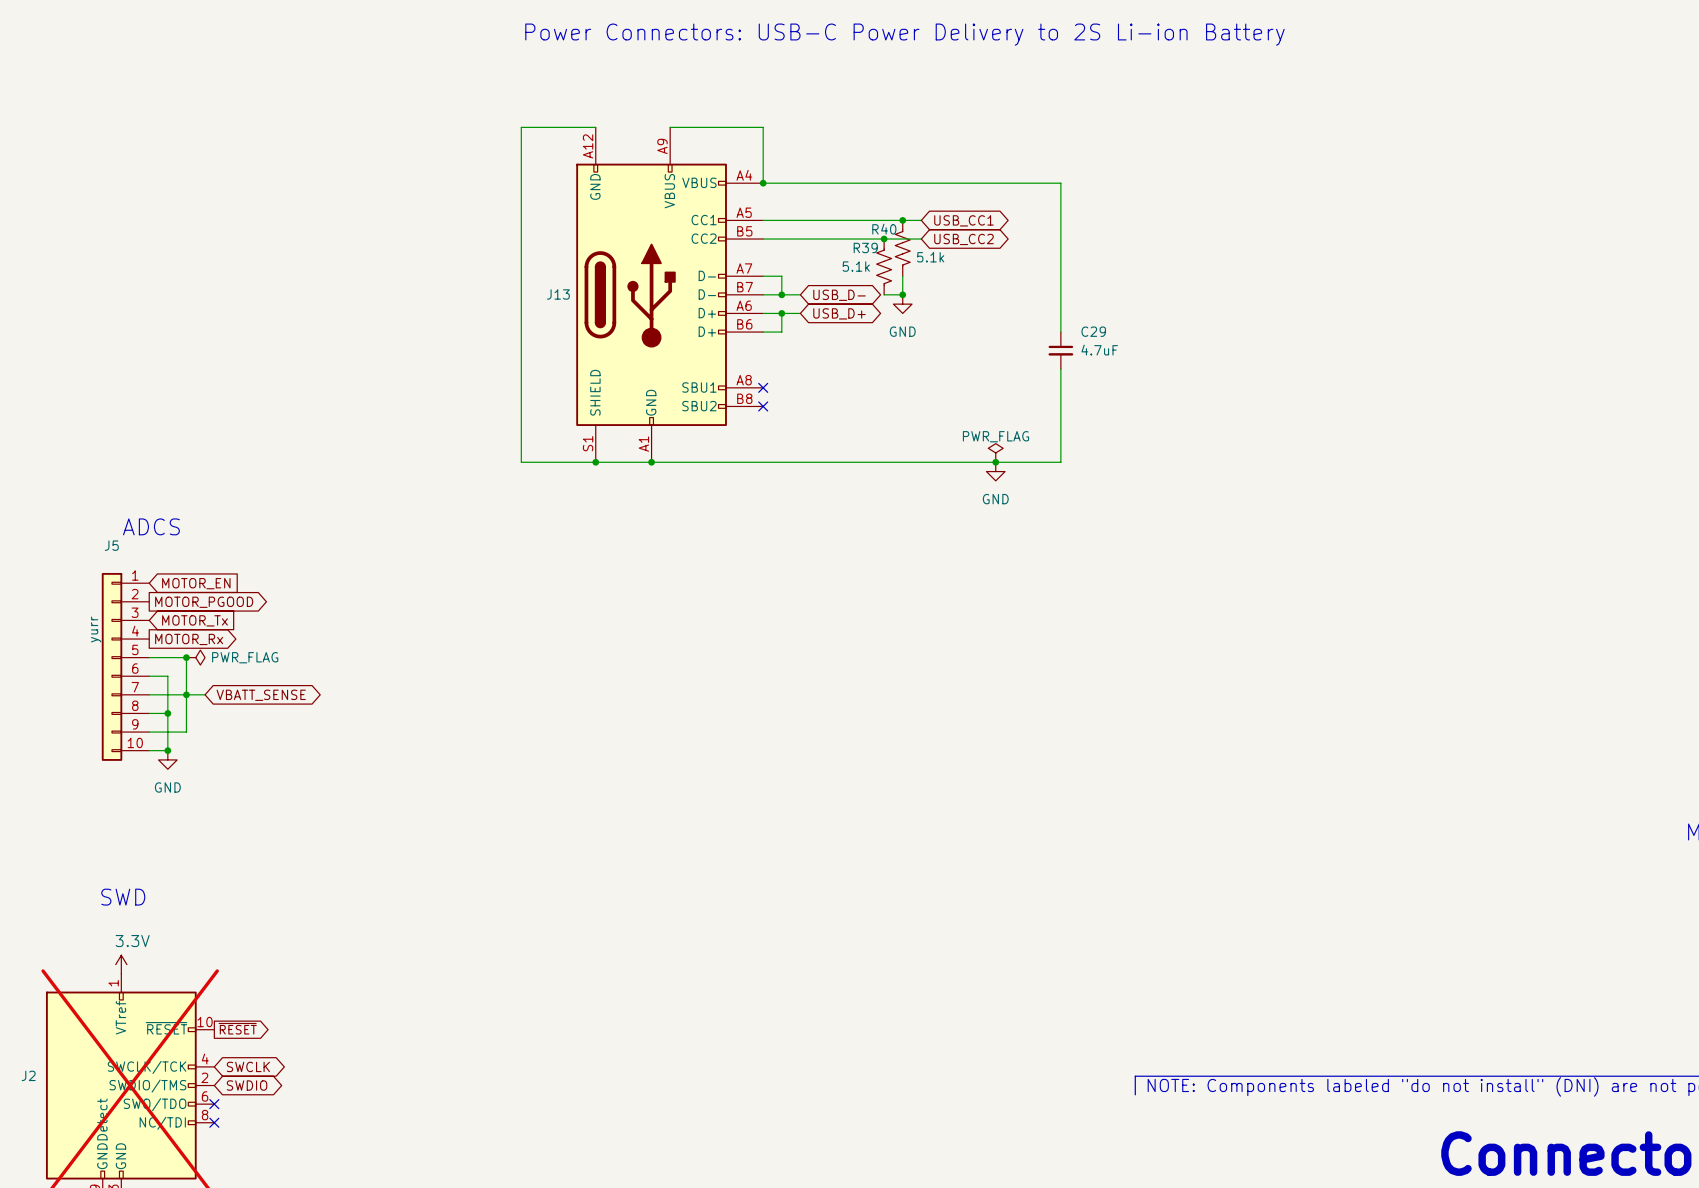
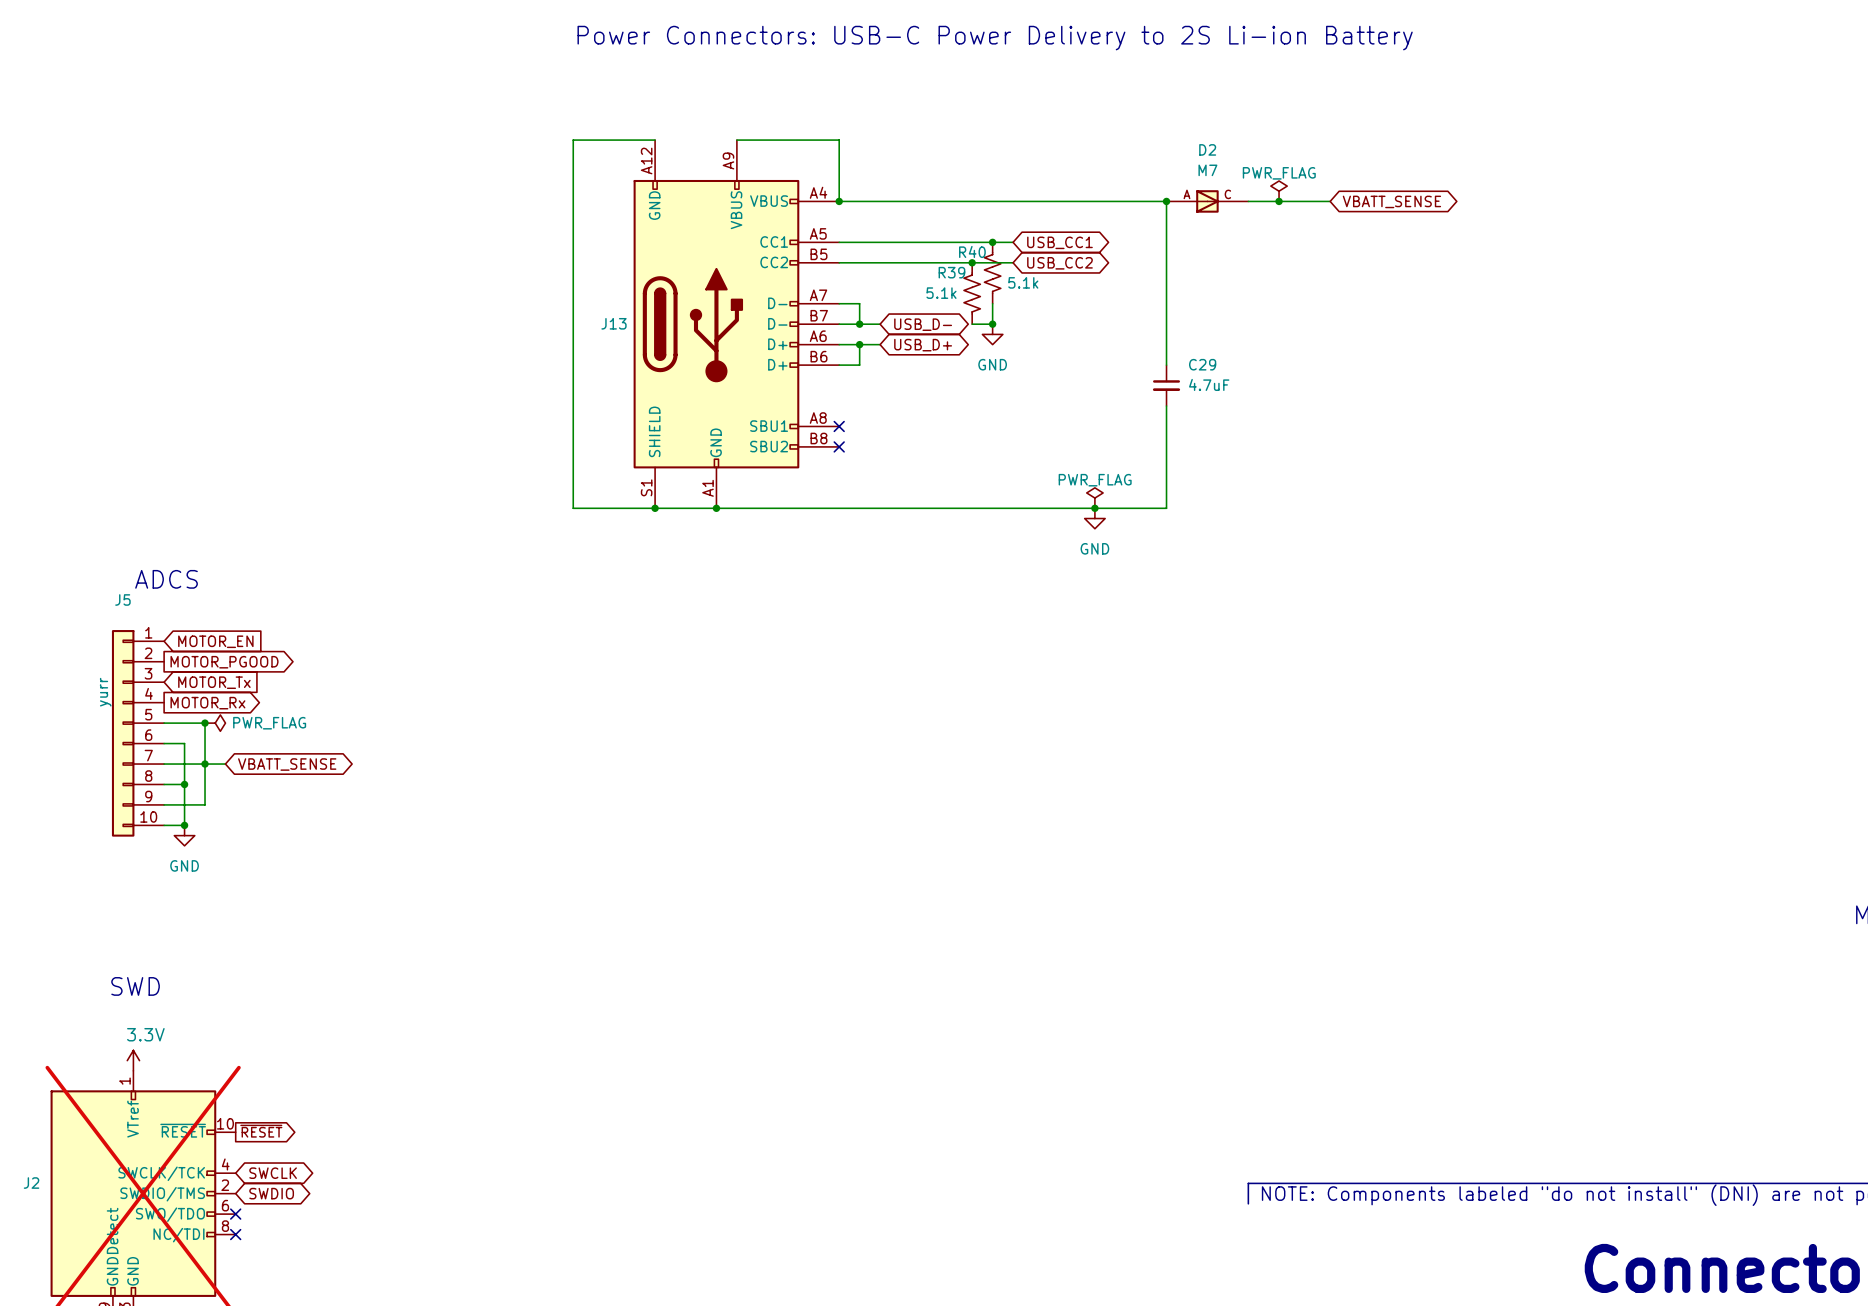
power symbol: none -> PWR_FLAG (1279, 191)
junction: none -> (1166, 201)
D2: none -> M7 (1207, 201)
wire: none -> (1248, 201) (1330, 201)
junction: none -> (1279, 201)
global label: none -> VBATT_SENSE (1391, 201)

